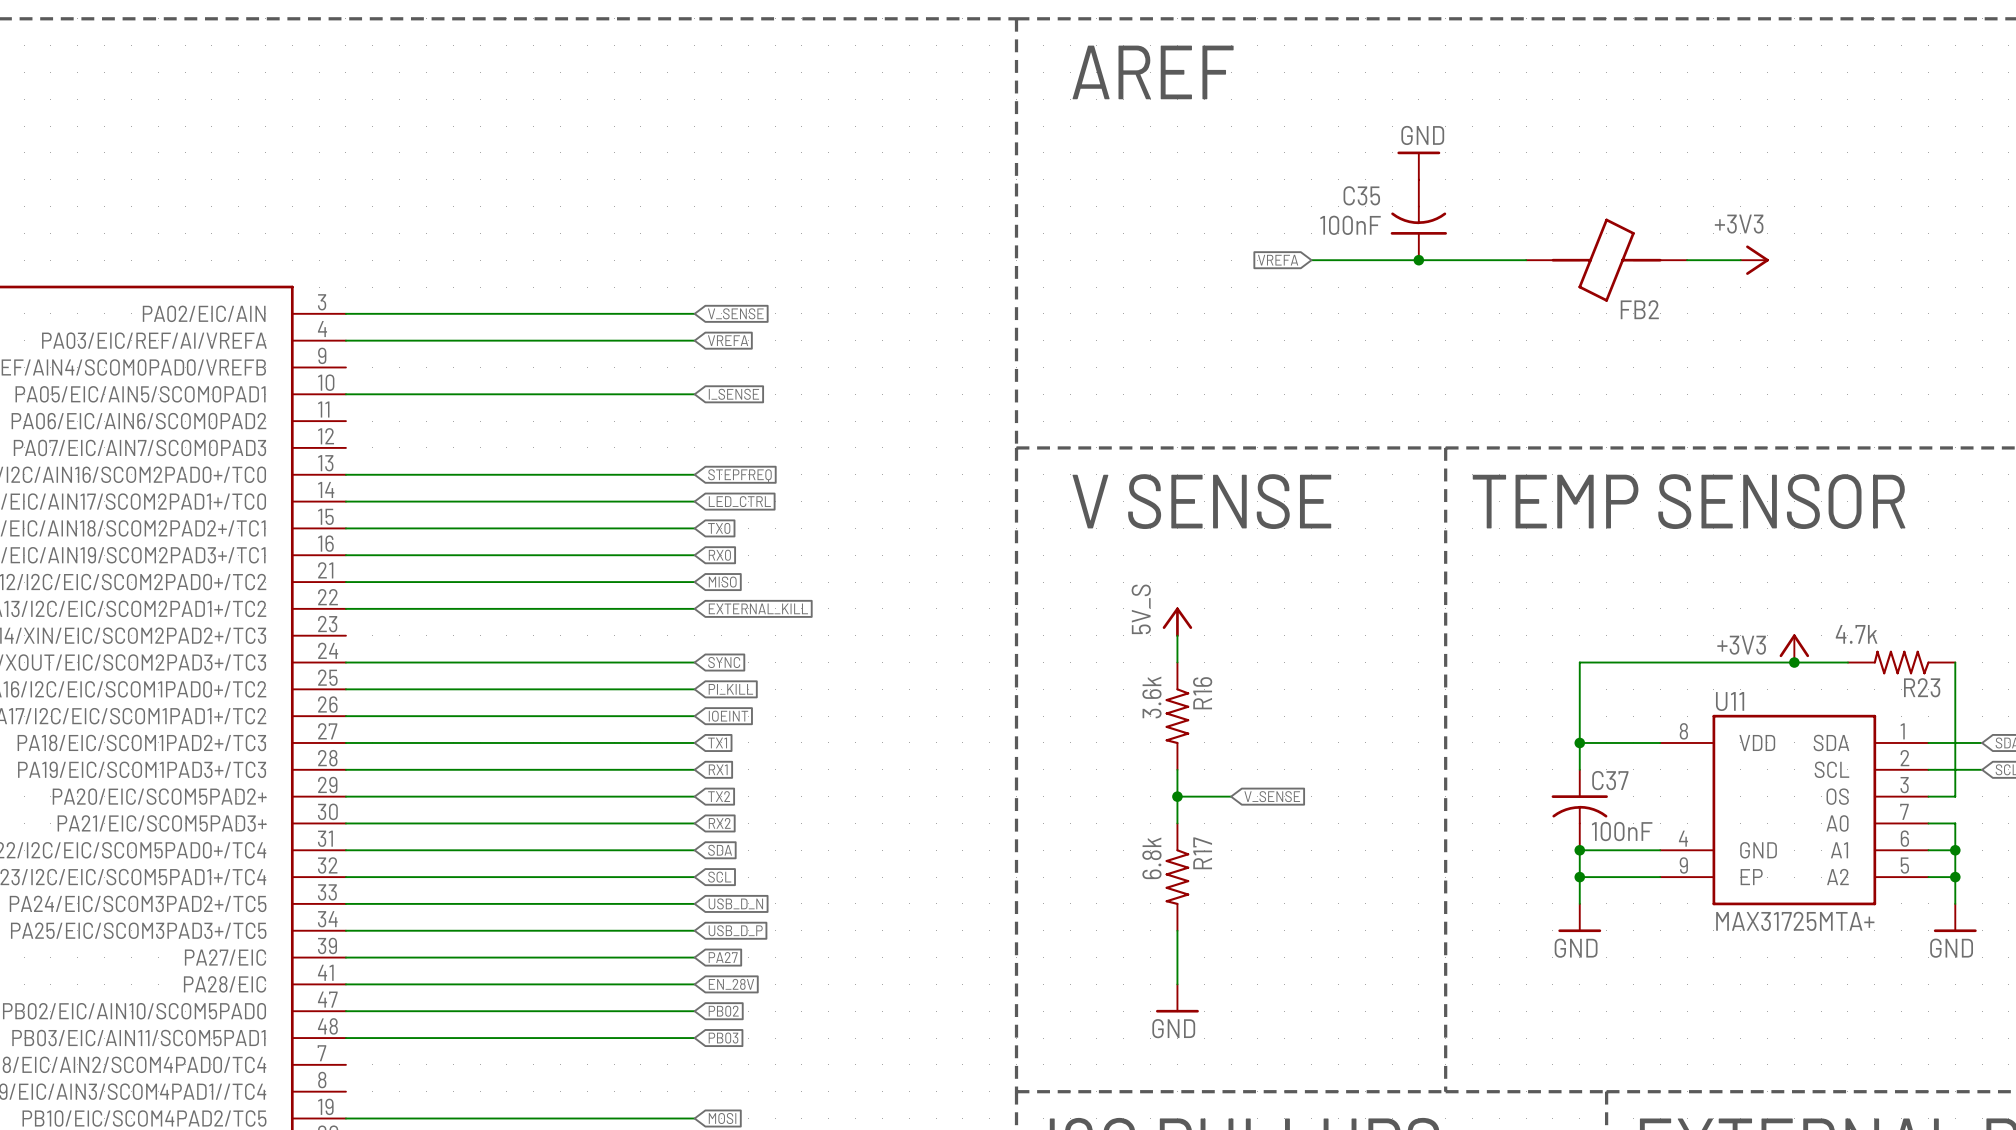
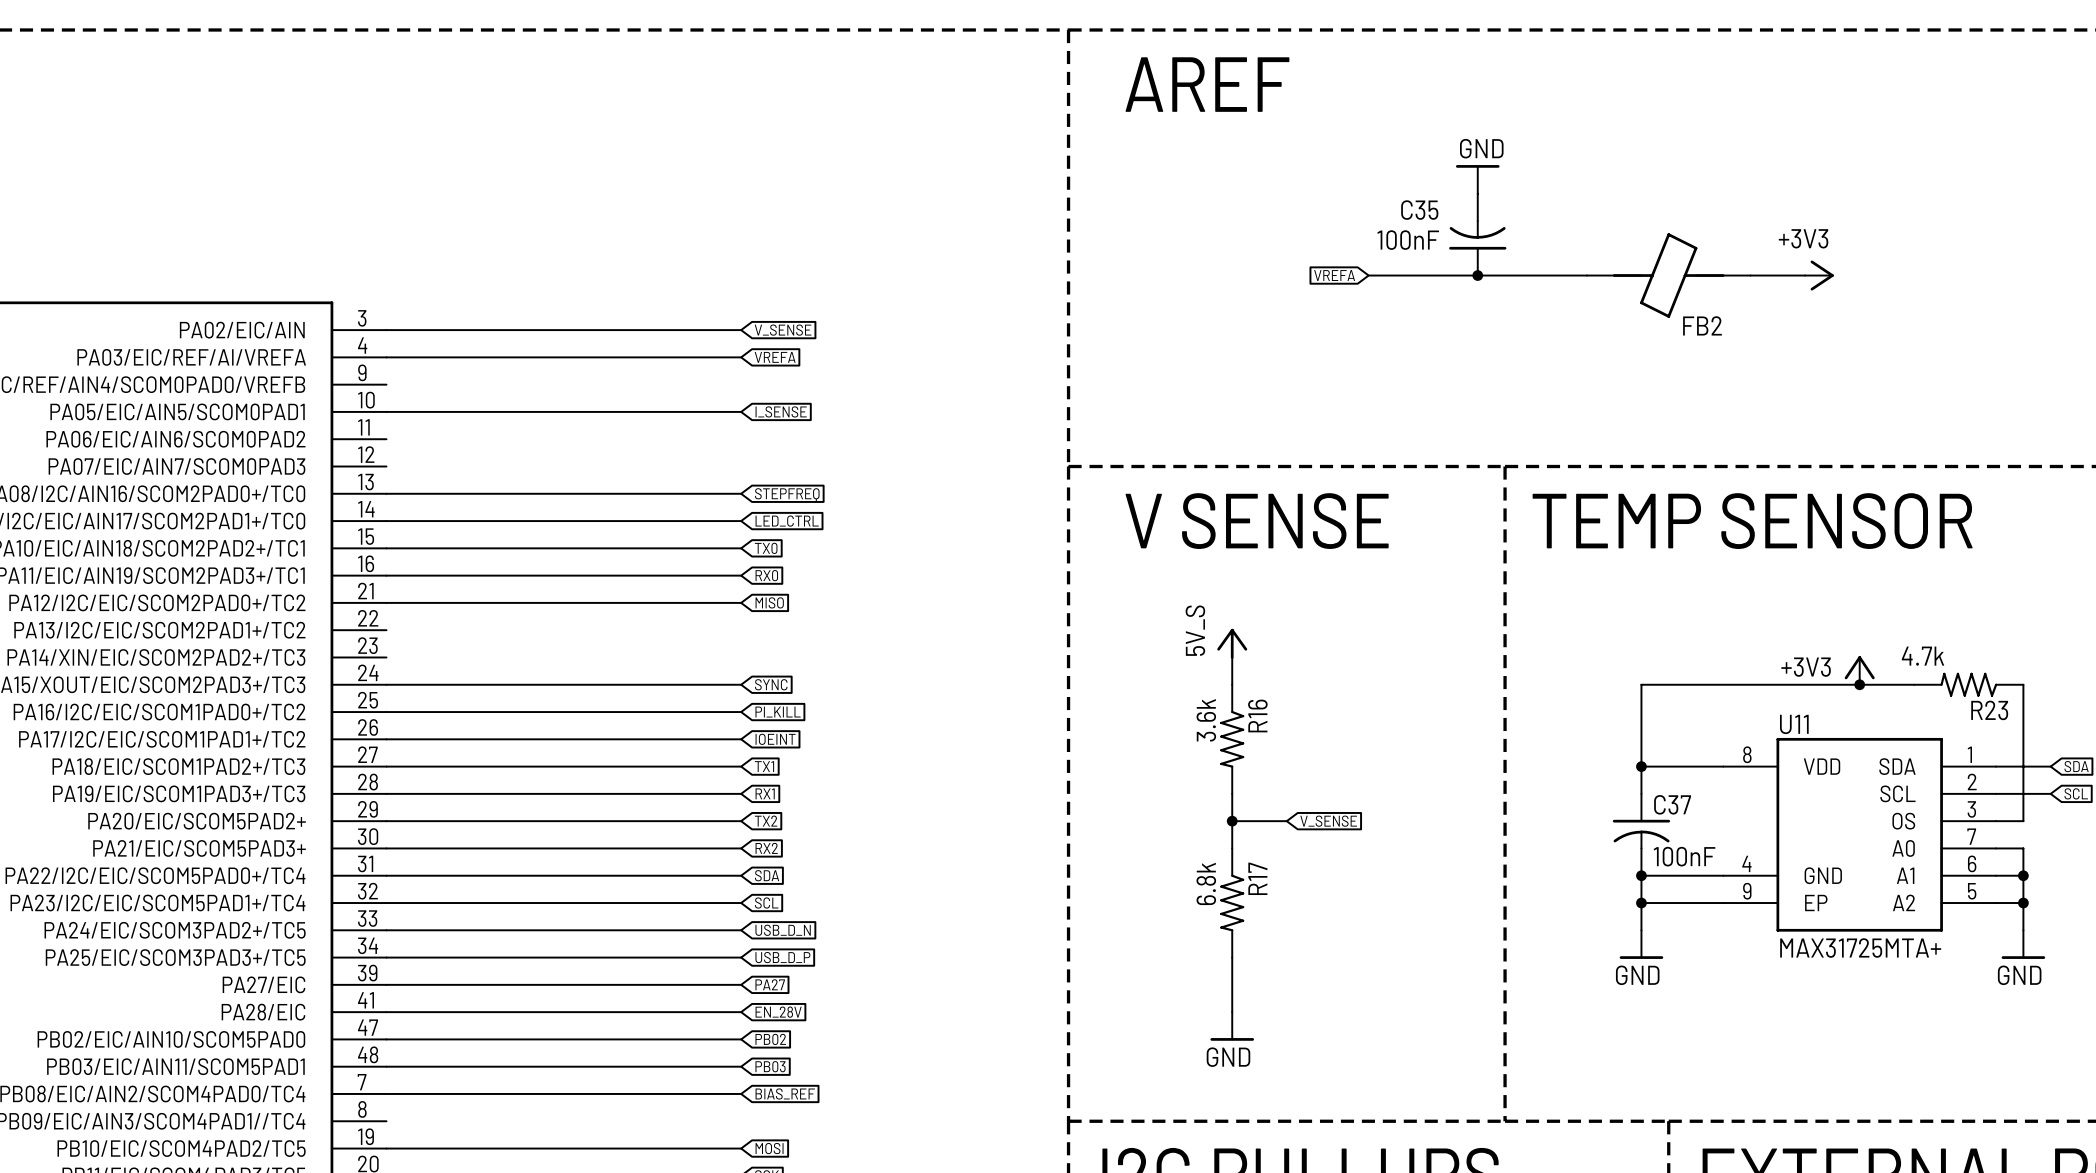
wire: (345, 608) (694, 608) -> none
global label: EXTERNAL_KILL (758, 608) -> none
wire: none -> (386, 1093) (741, 1093)
global label: none -> BIAS_REF (785, 1093)

